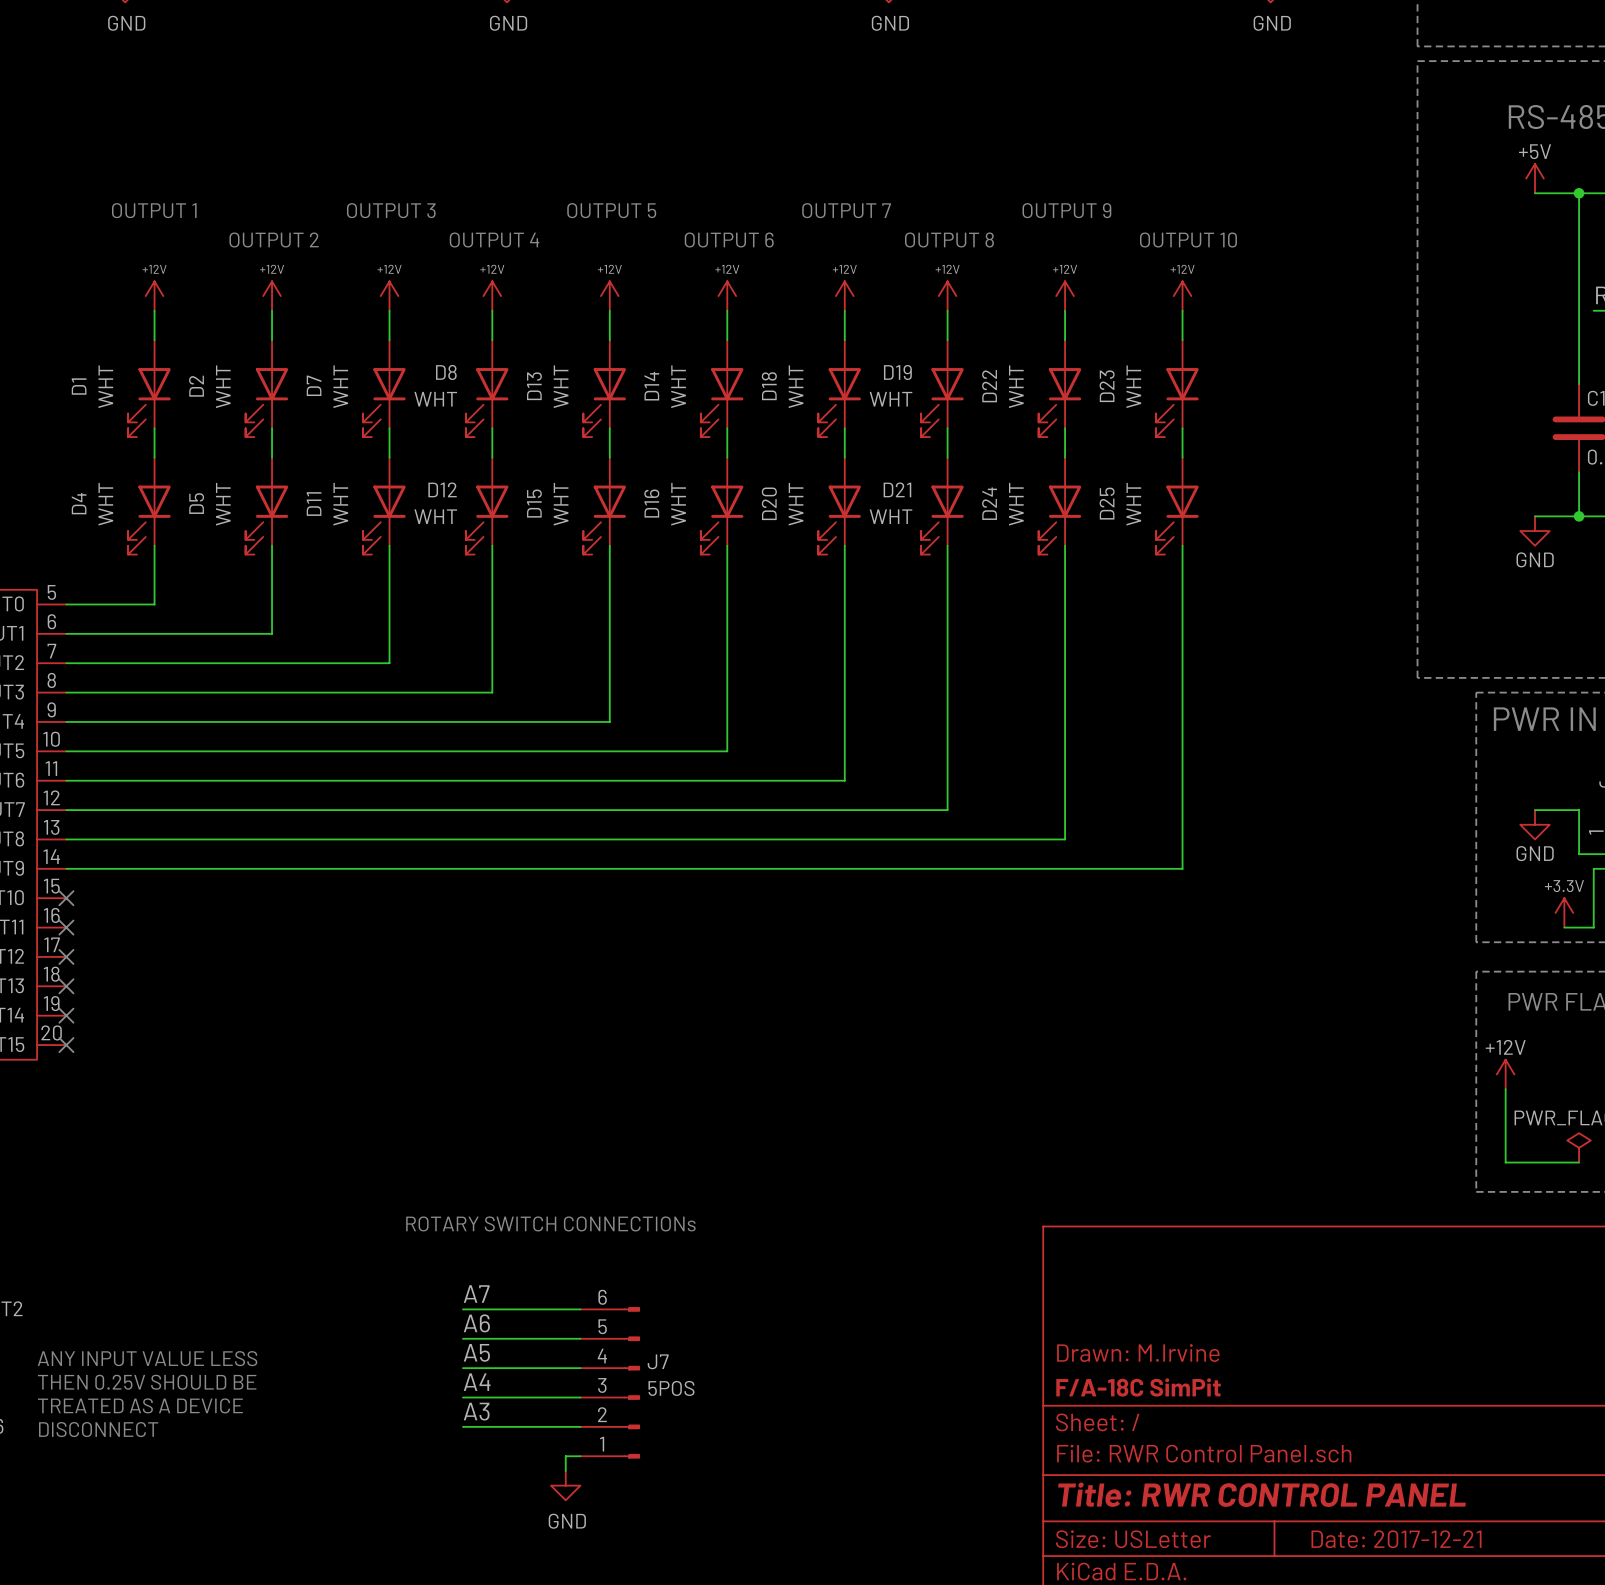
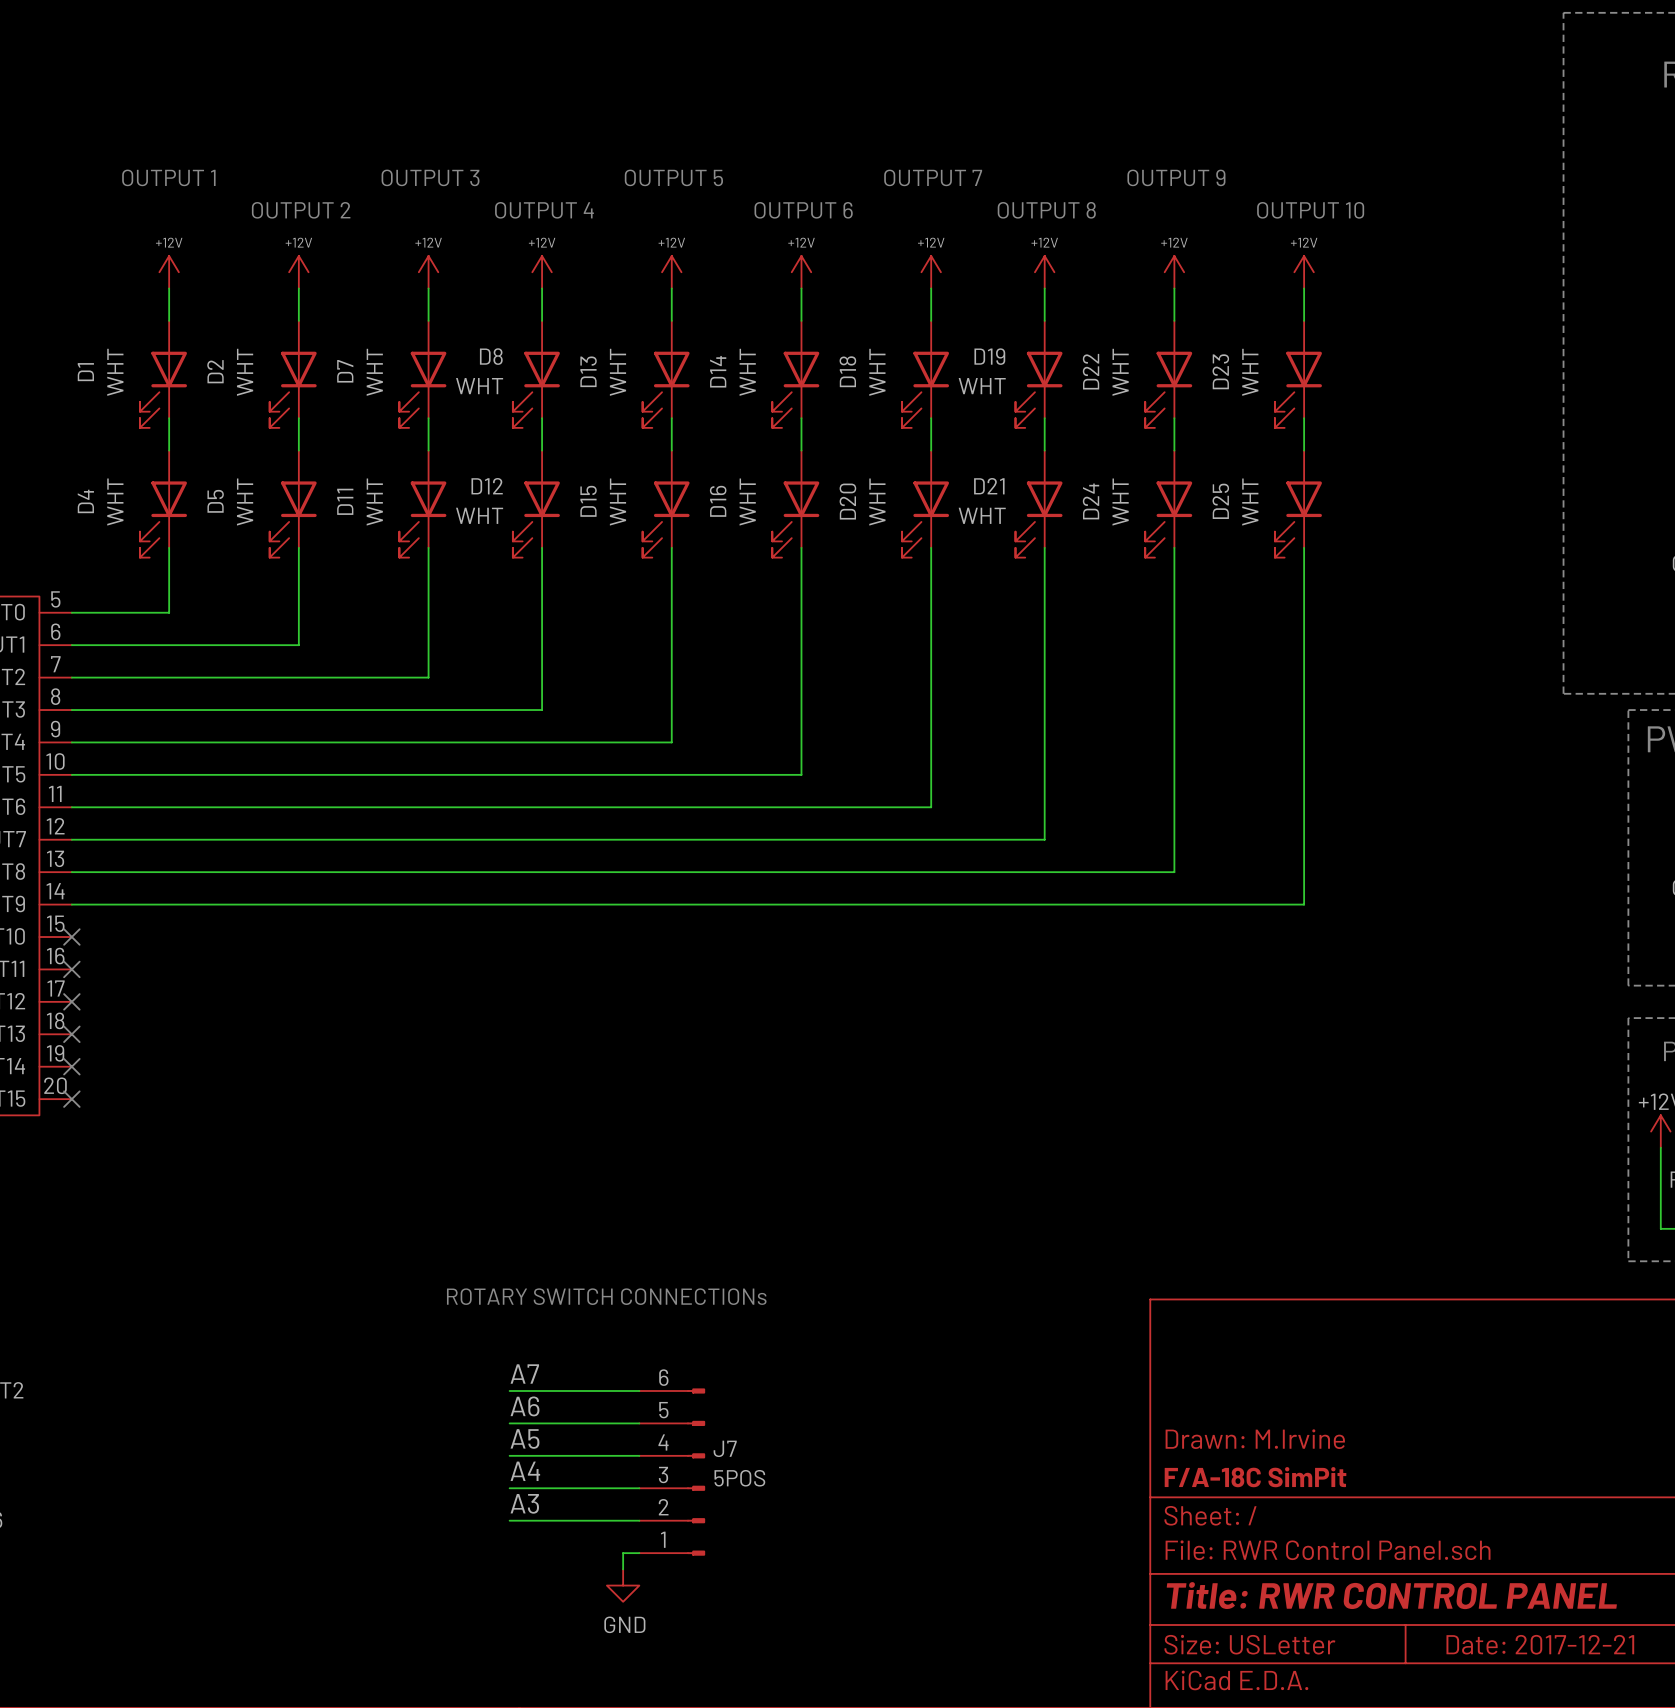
text: ANY INPUT VALUE LESS (147, 1358) -> none
text: THEN 0.25V SHOULD BE (147, 1382) -> none
text: TREATED AS A DEVICE (140, 1405) -> none
text: DISCONNECT (98, 1429) -> none

